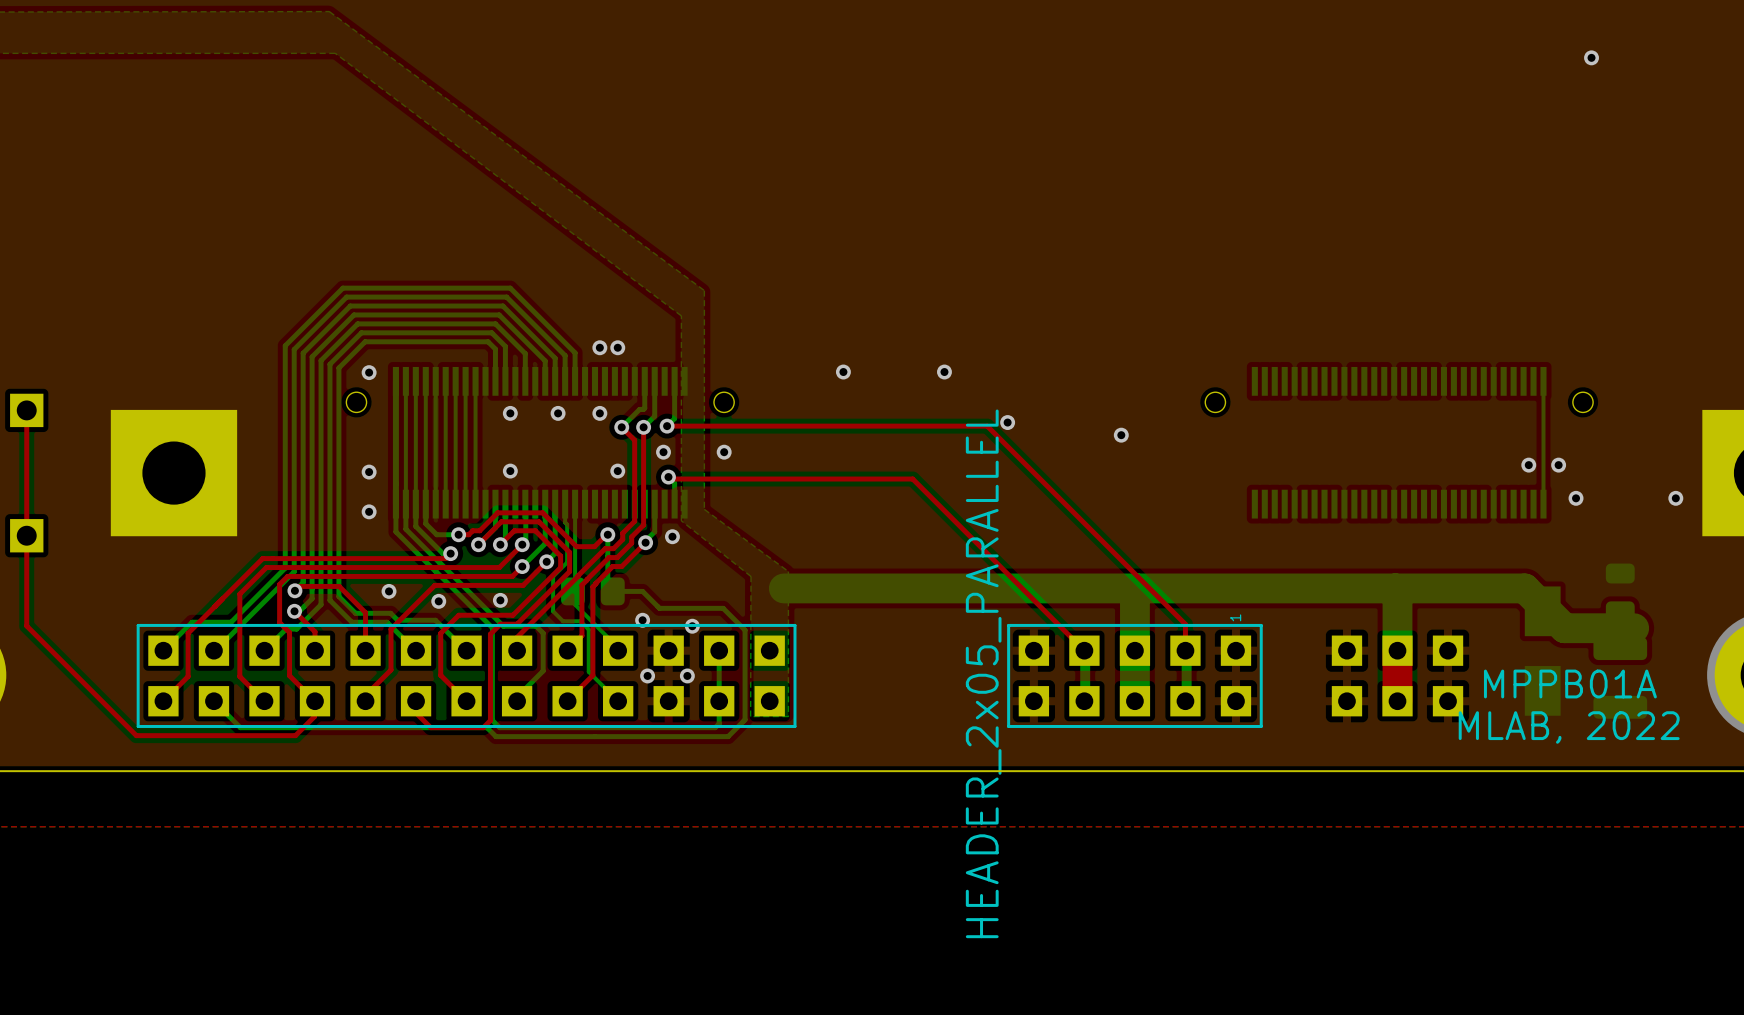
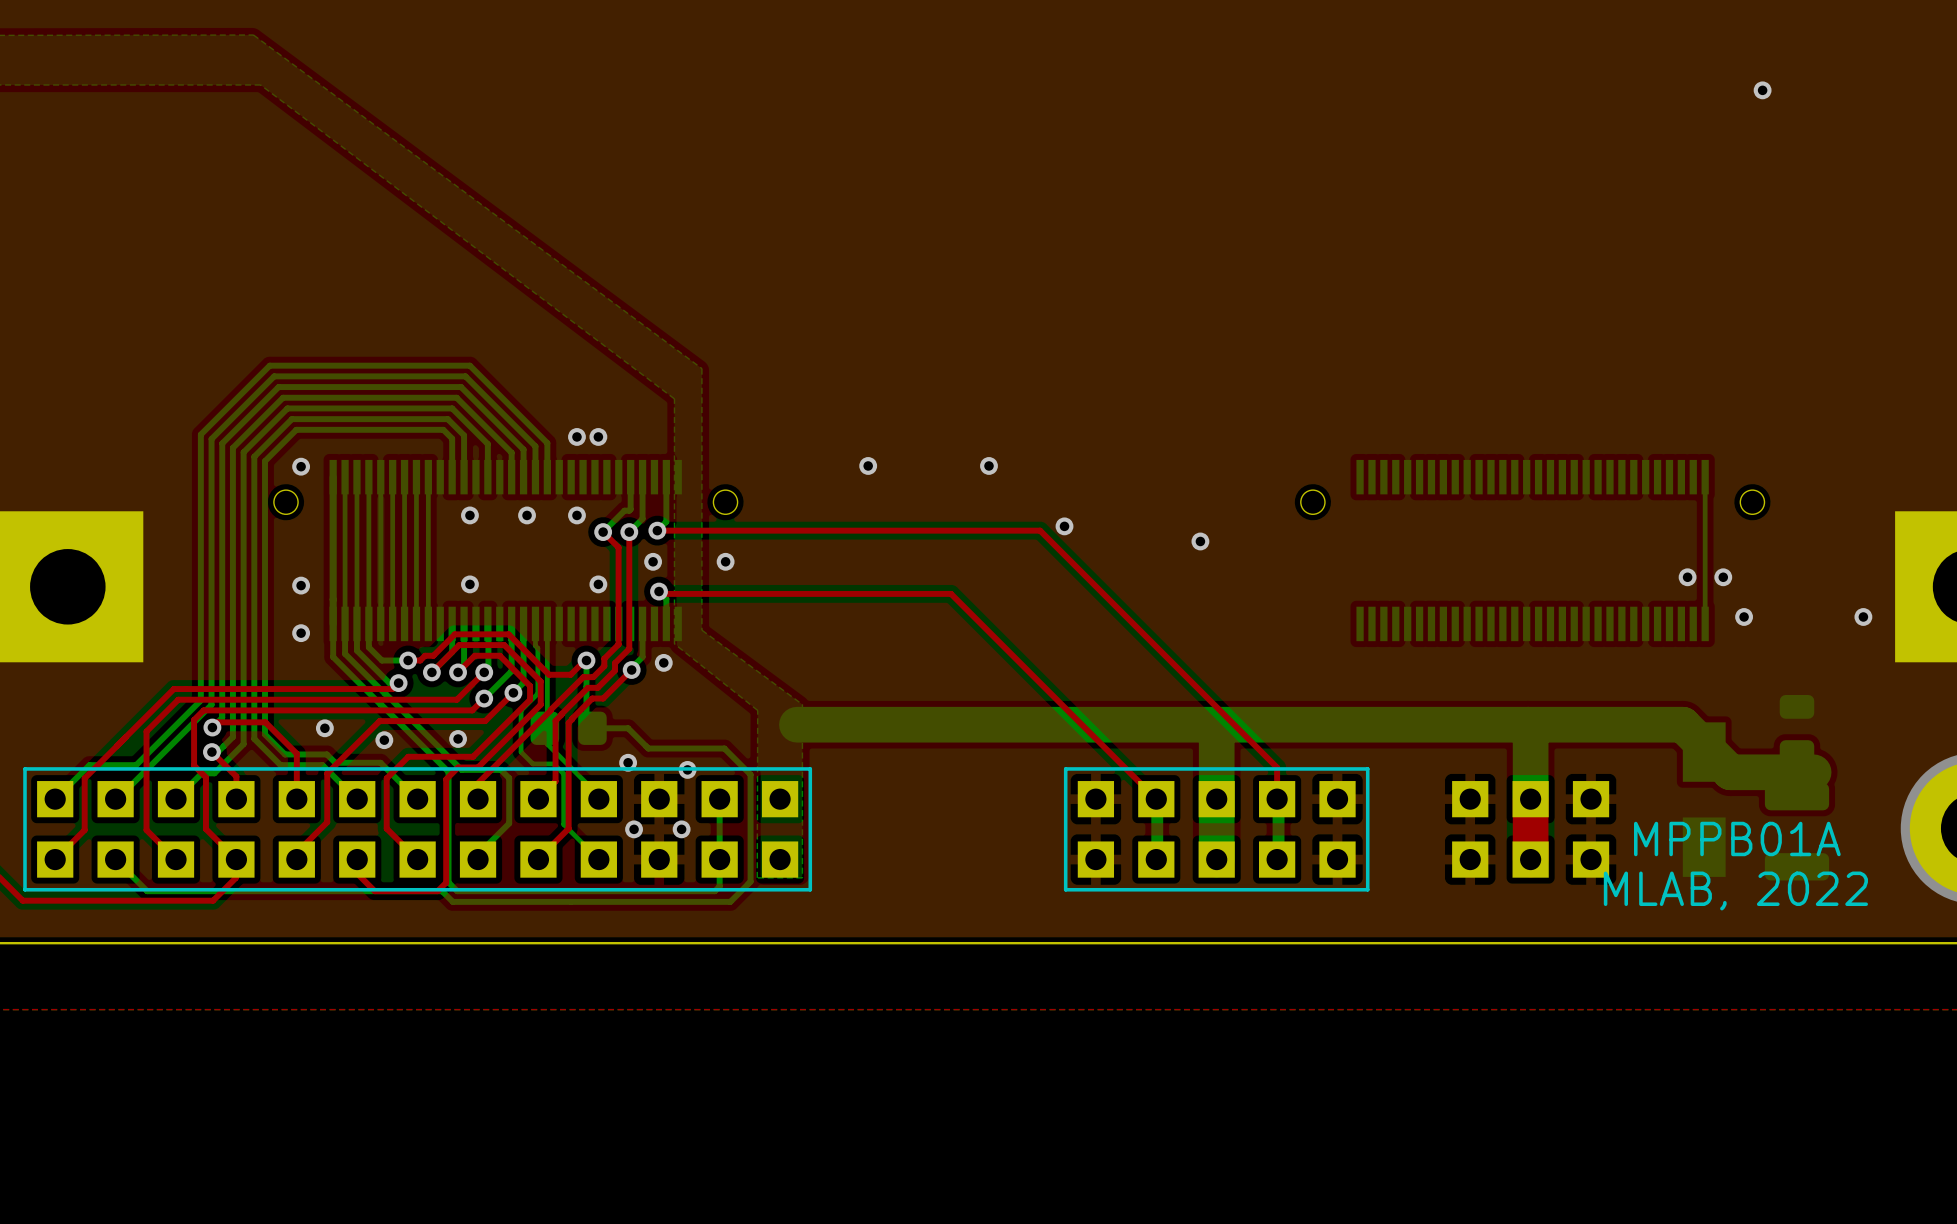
part text: 1 (1235, 617) -> none
part value: HEADER_2x05_PARALLEL (983, 673) -> none

